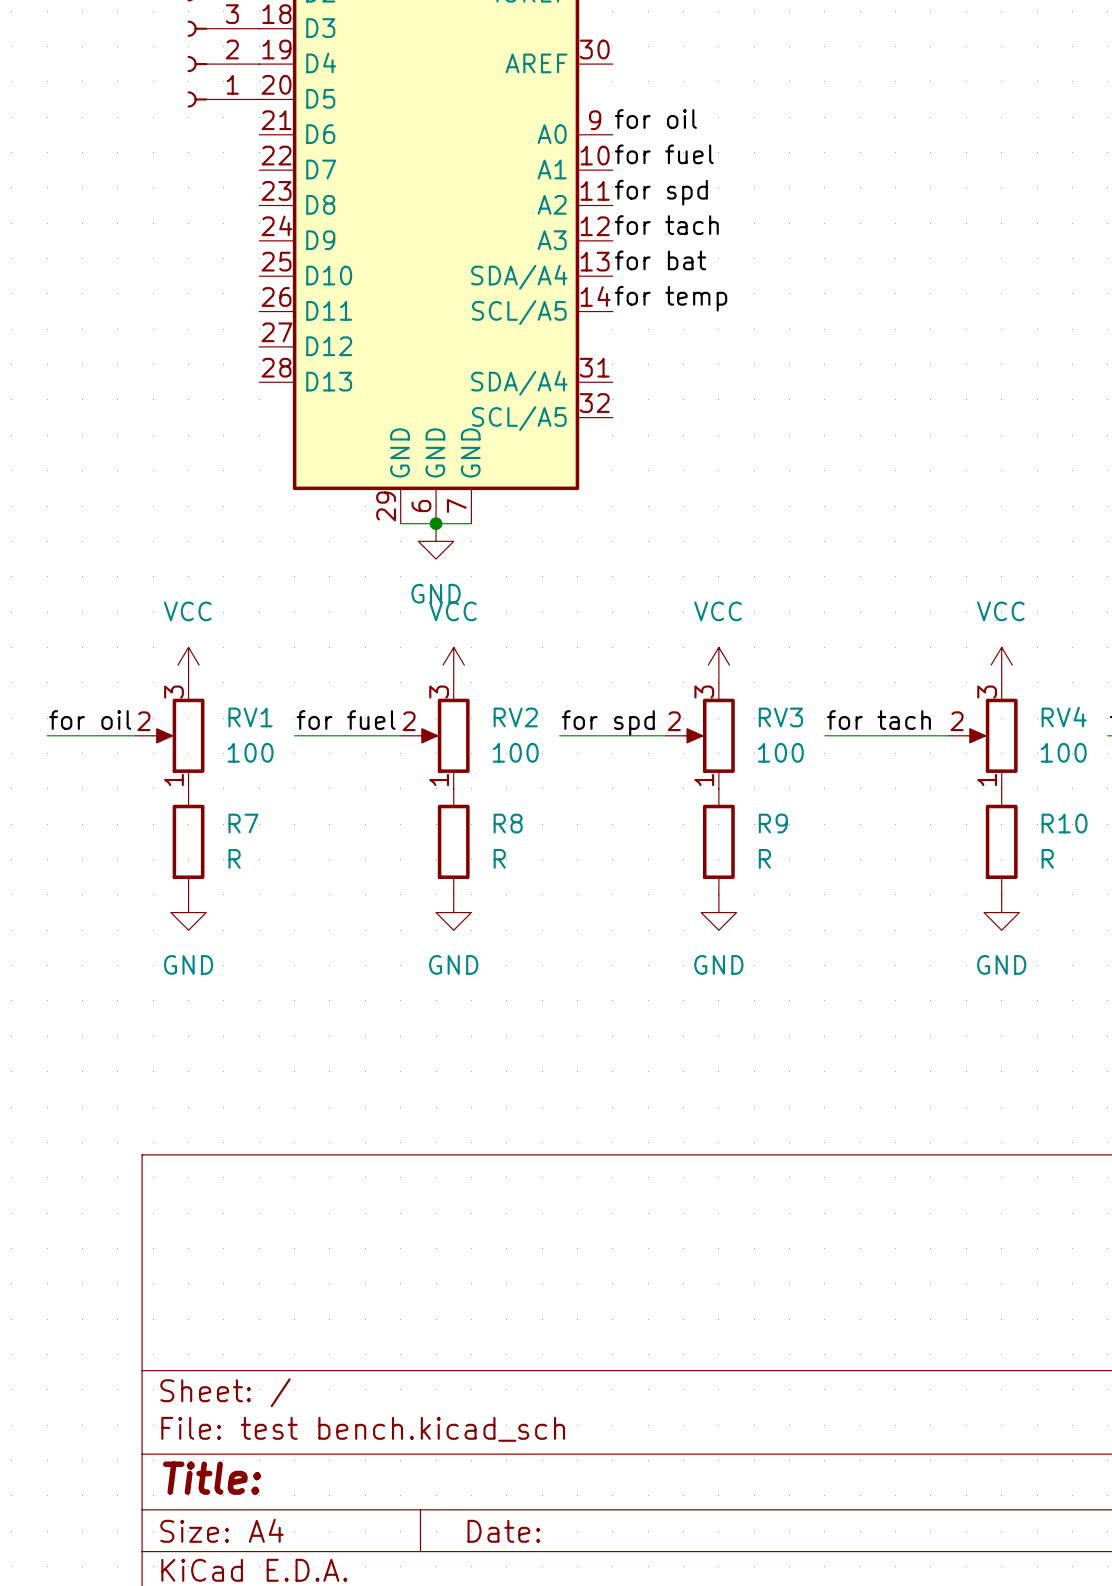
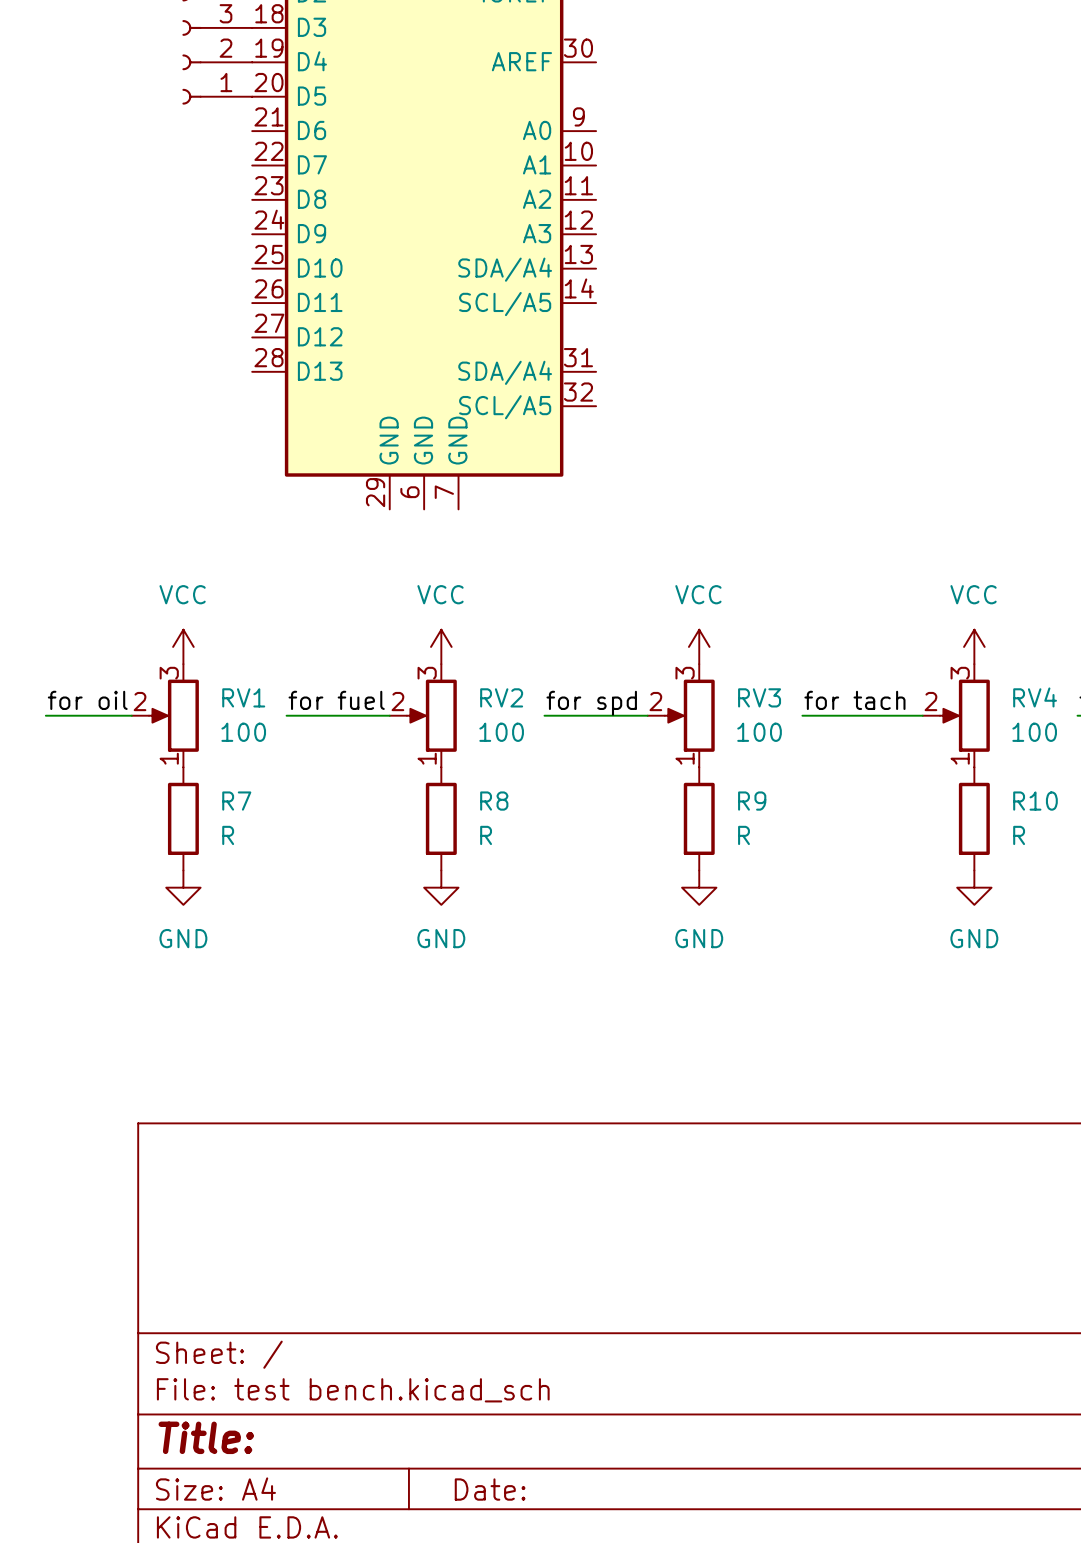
label: for oil (655, 119) -> none
label: for fuel (664, 154) -> none
label: for spd (661, 192) -> none
label: for tach (666, 225) -> none
label: for bat (660, 260) -> none
label: for temp (671, 298) -> none
wire: (400, 523) (471, 523) -> none
junction: (436, 523) -> none
power symbol: GND (436, 541) -> none

